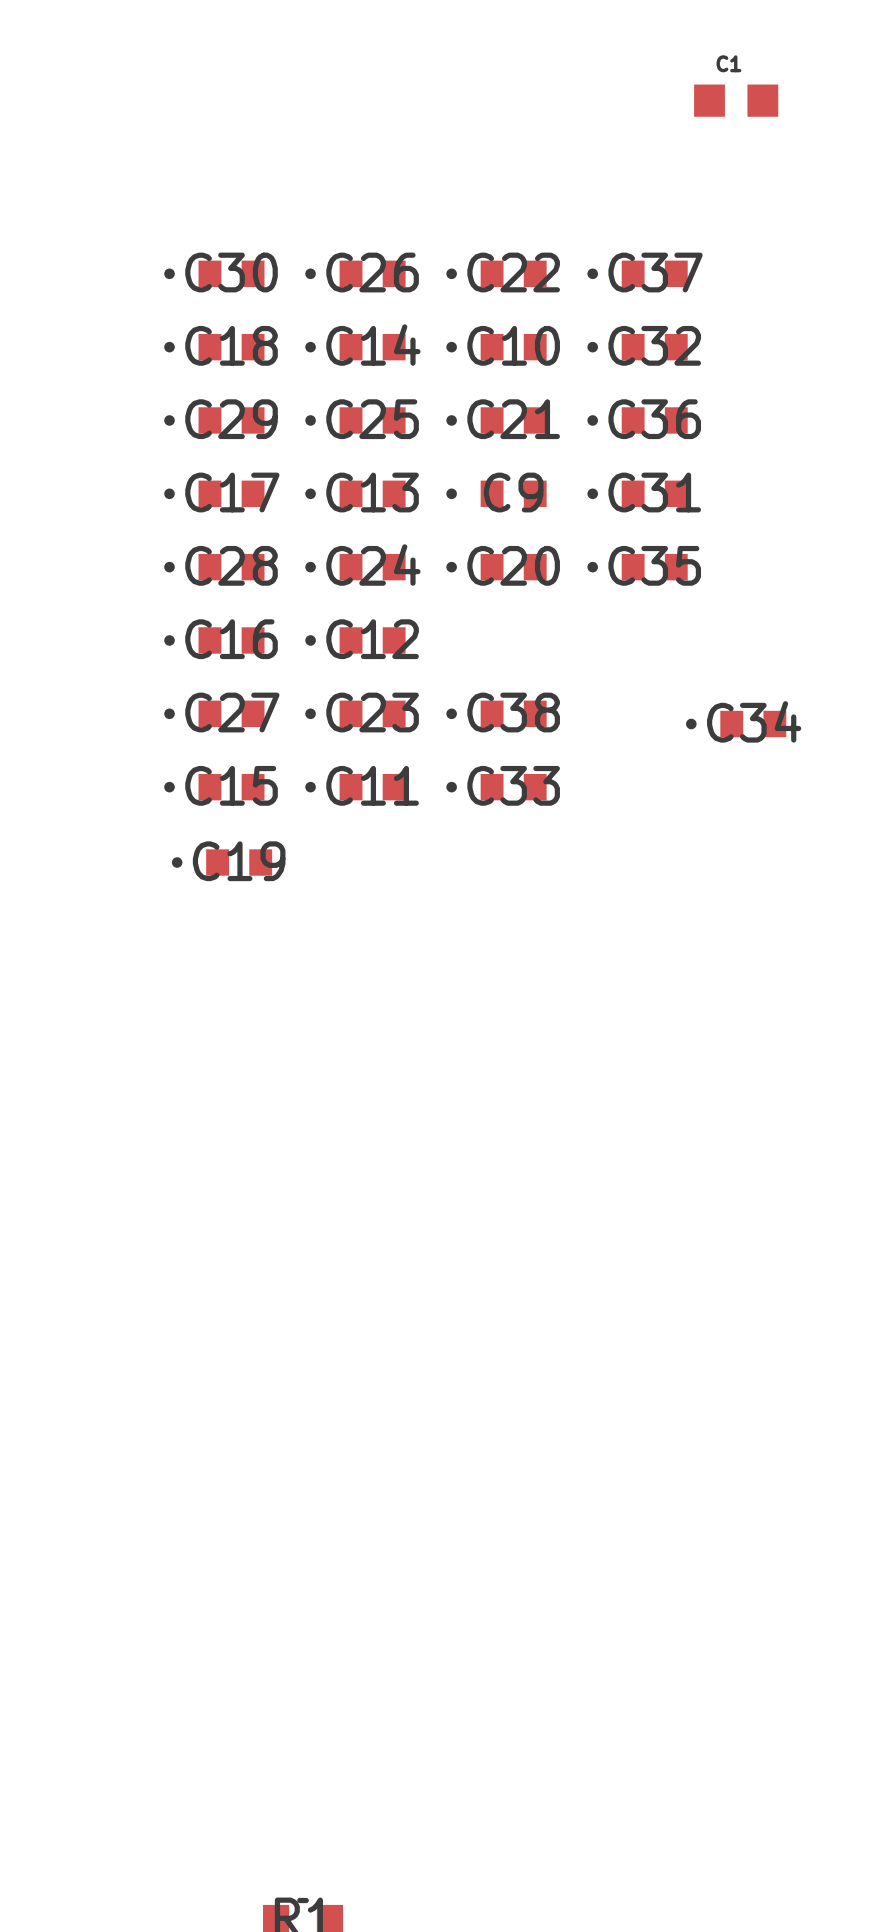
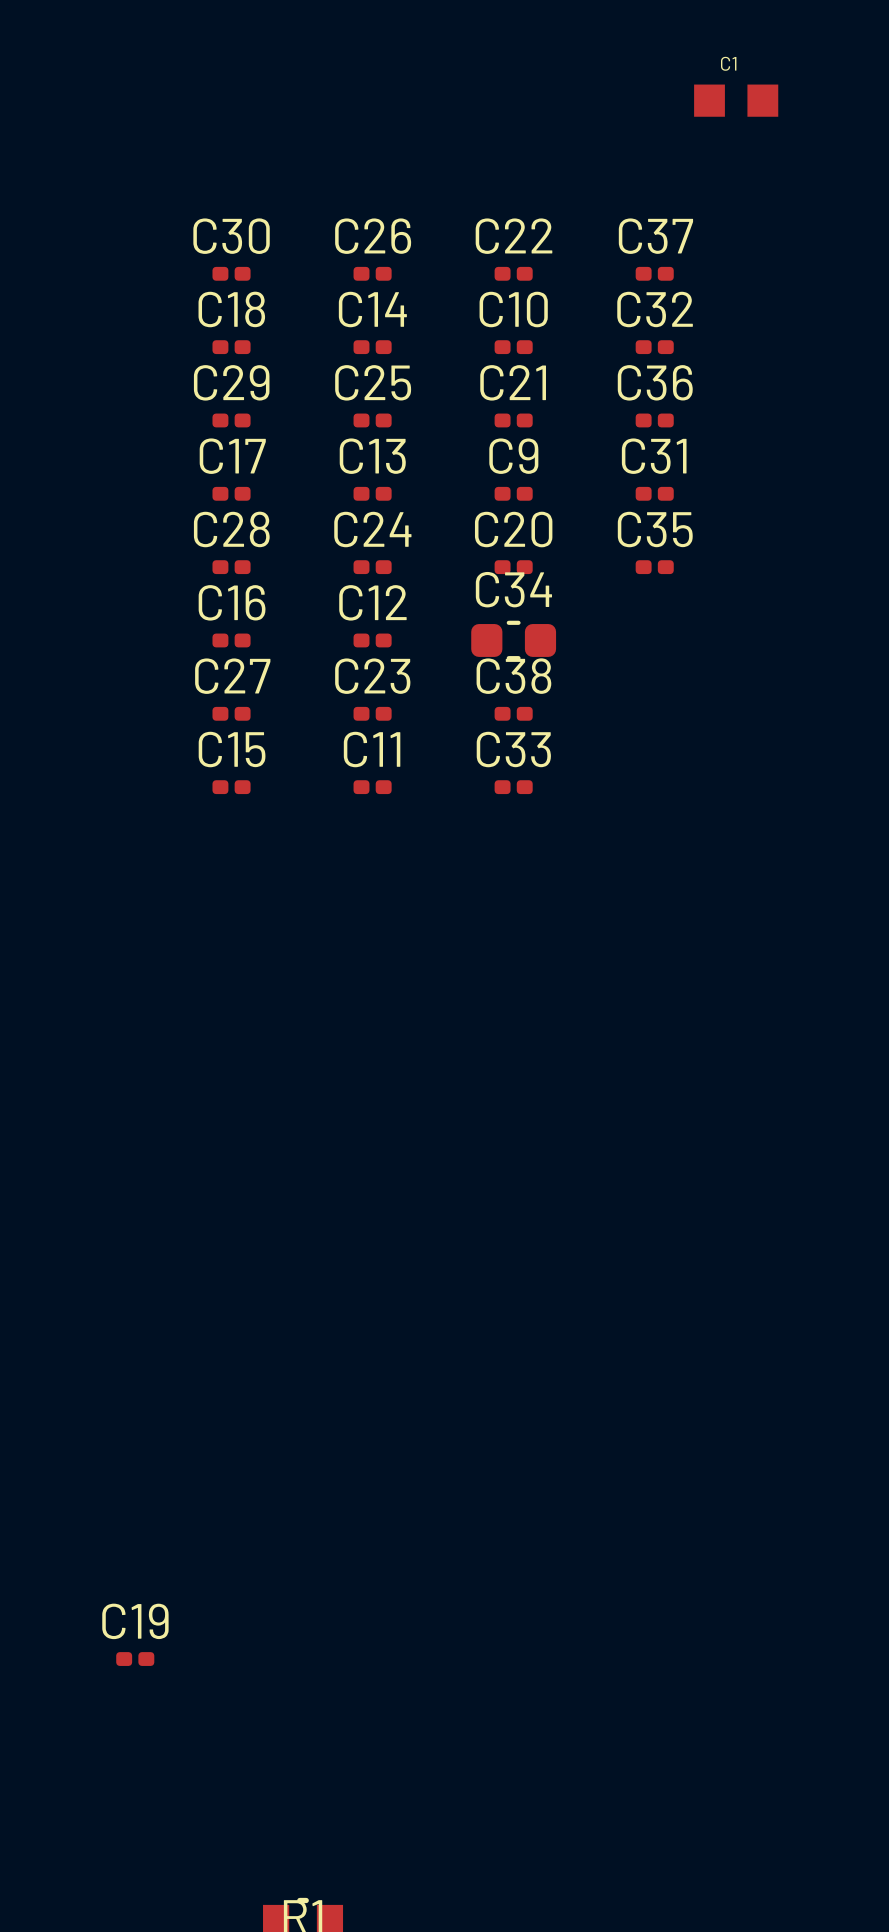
C30 footprint: [164, 260, 265, 288] -> [212, 266, 251, 281]
C26 footprint: [305, 260, 406, 288] -> [353, 266, 392, 281]
C22 footprint: [446, 260, 547, 288] -> [494, 266, 533, 281]
C37 footprint: [587, 260, 688, 288] -> [635, 266, 674, 281]
C18 footprint: [164, 333, 265, 361] -> [212, 340, 251, 355]
C14 footprint: [305, 333, 406, 361] -> [353, 340, 392, 355]
C10 footprint: [446, 333, 547, 361] -> [494, 340, 533, 355]
C32 footprint: [587, 333, 688, 361] -> [635, 340, 674, 355]
C29 footprint: [164, 407, 265, 434] -> [212, 413, 251, 428]
C25 footprint: [305, 407, 406, 434] -> [353, 413, 392, 428]
C21 footprint: [446, 407, 547, 434] -> [494, 413, 533, 428]
C36 footprint: [587, 407, 688, 434] -> [635, 413, 674, 428]
C17 footprint: [164, 480, 265, 508] -> [212, 486, 251, 501]
C13 footprint: [305, 480, 406, 508] -> [353, 486, 392, 501]
C9 footprint: [446, 480, 547, 508] -> [494, 486, 533, 501]
C31 footprint: [587, 480, 688, 508] -> [635, 486, 674, 501]
C28 footprint: [164, 553, 265, 581] -> [212, 560, 251, 575]
C24 footprint: [305, 553, 406, 581] -> [353, 560, 392, 575]
C20 footprint: [446, 553, 547, 581] -> [494, 560, 533, 575]
C35 footprint: [587, 553, 688, 581] -> [635, 560, 674, 575]
C16 footprint: [164, 627, 265, 654] -> [212, 633, 251, 648]
C12 footprint: [305, 627, 406, 654] -> [353, 633, 392, 648]
C27 footprint: [164, 700, 265, 728] -> [212, 706, 251, 721]
C23 footprint: [305, 700, 406, 728] -> [353, 706, 392, 721]
C38 footprint: [446, 700, 547, 728] -> [494, 706, 533, 721]
C34 footprint: [686, 710, 787, 738] -> [471, 620, 557, 661]
C15 footprint: [164, 773, 265, 801] -> [212, 780, 251, 795]
C11 footprint: [305, 773, 406, 801] -> [353, 780, 392, 795]
C33 footprint: [446, 773, 547, 801] -> [494, 780, 533, 795]
C19 footprint: [171, 849, 273, 876] -> [116, 1652, 155, 1666]

